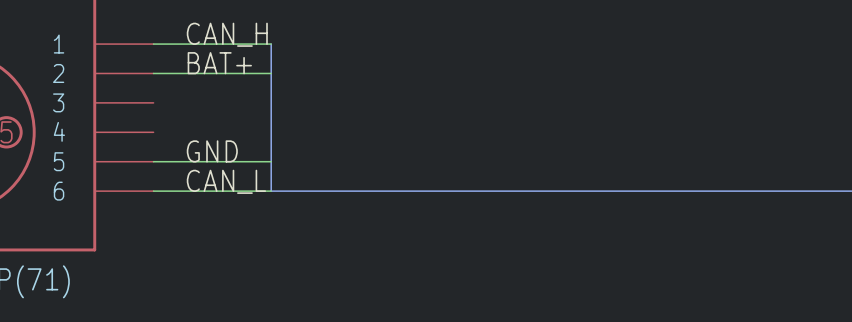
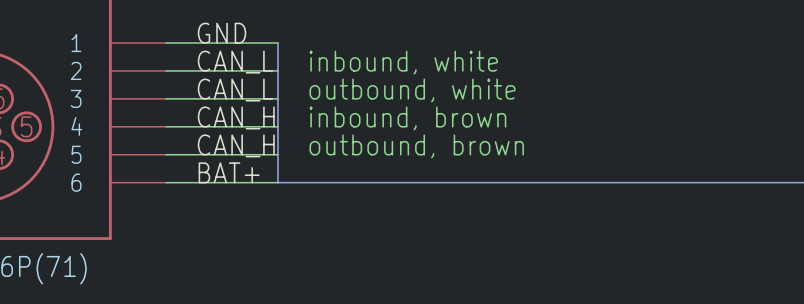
label: CAN_H (227, 34) -> GND (222, 33)
label: BAT+ (219, 63) -> CAN_L (235, 62)
text: none -> inbound, white (403, 62)
label: none -> CAN_L (235, 90)
text: none -> outbound, white (412, 90)
wire: none -> (166, 98) (277, 98)
label: none -> CAN_H (236, 117)
text: none -> inbound, brown (407, 118)
wire: none -> (166, 126) (277, 126)
label: GND (212, 151) -> CAN_H (236, 145)
text: none -> outbound, brown (416, 146)
label: CAN_L (226, 181) -> BAT+ (229, 172)

